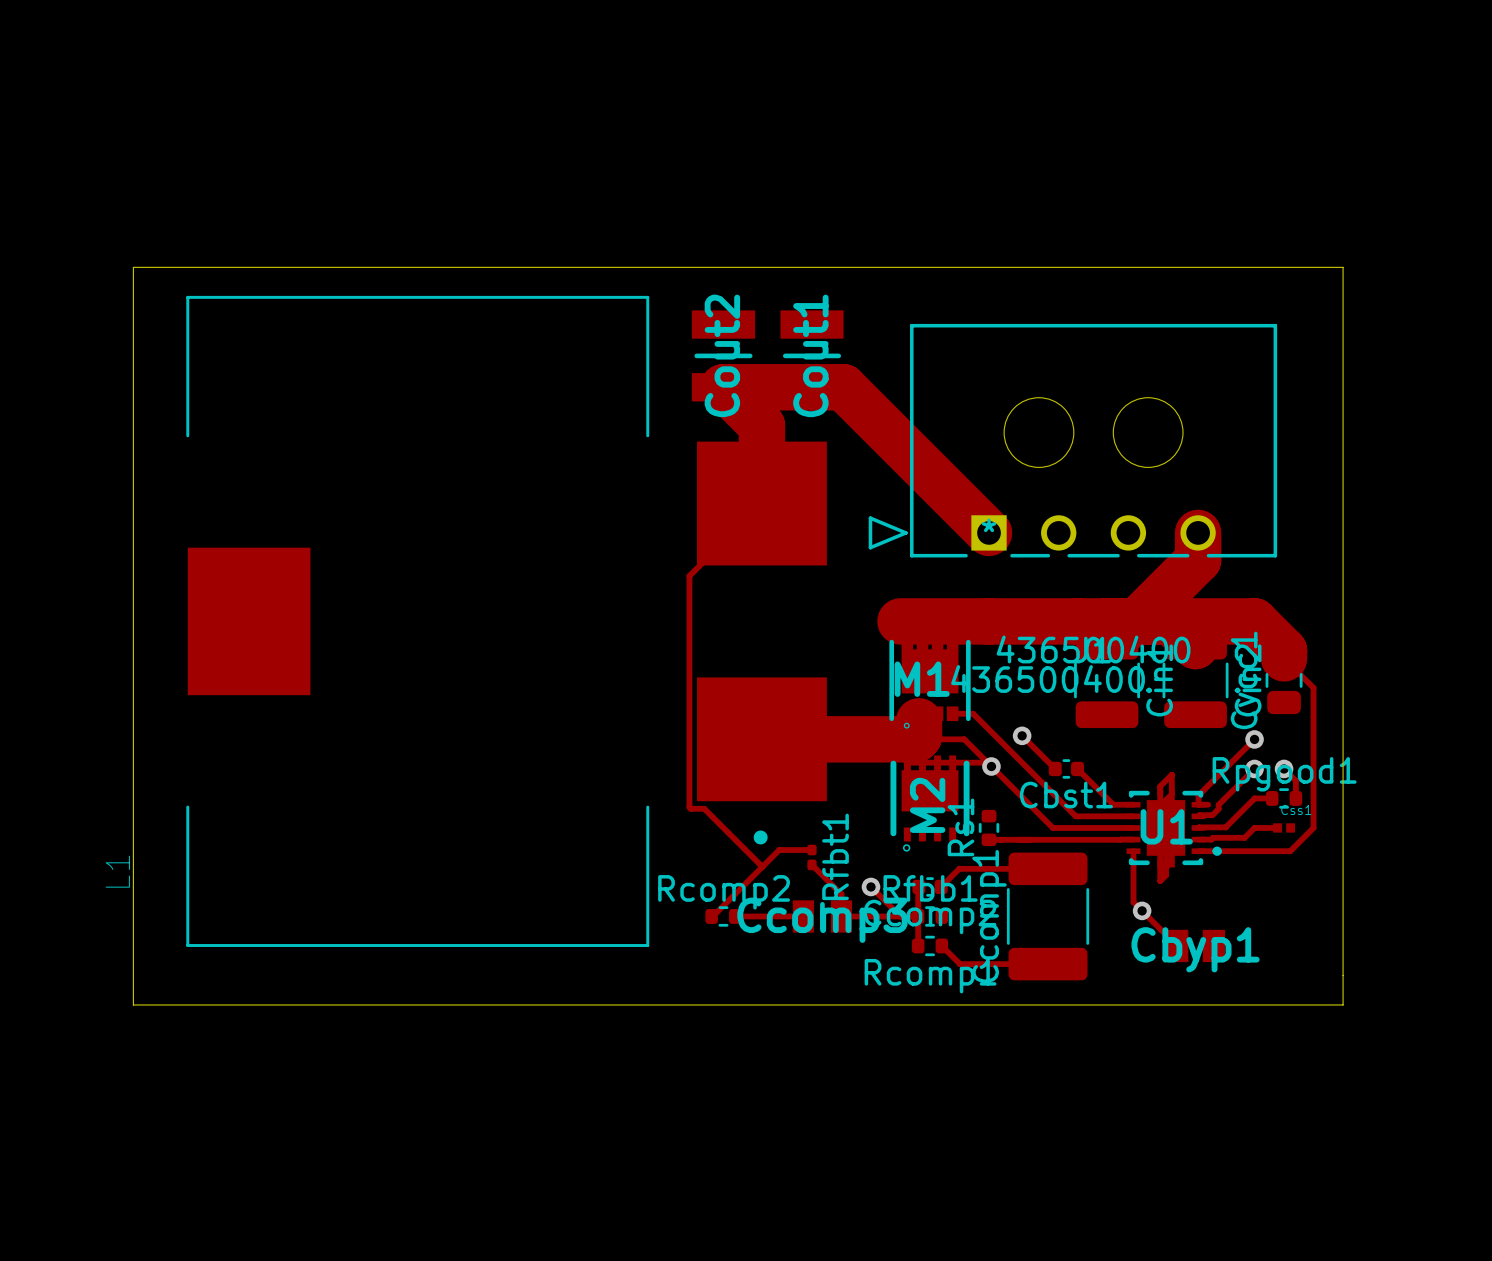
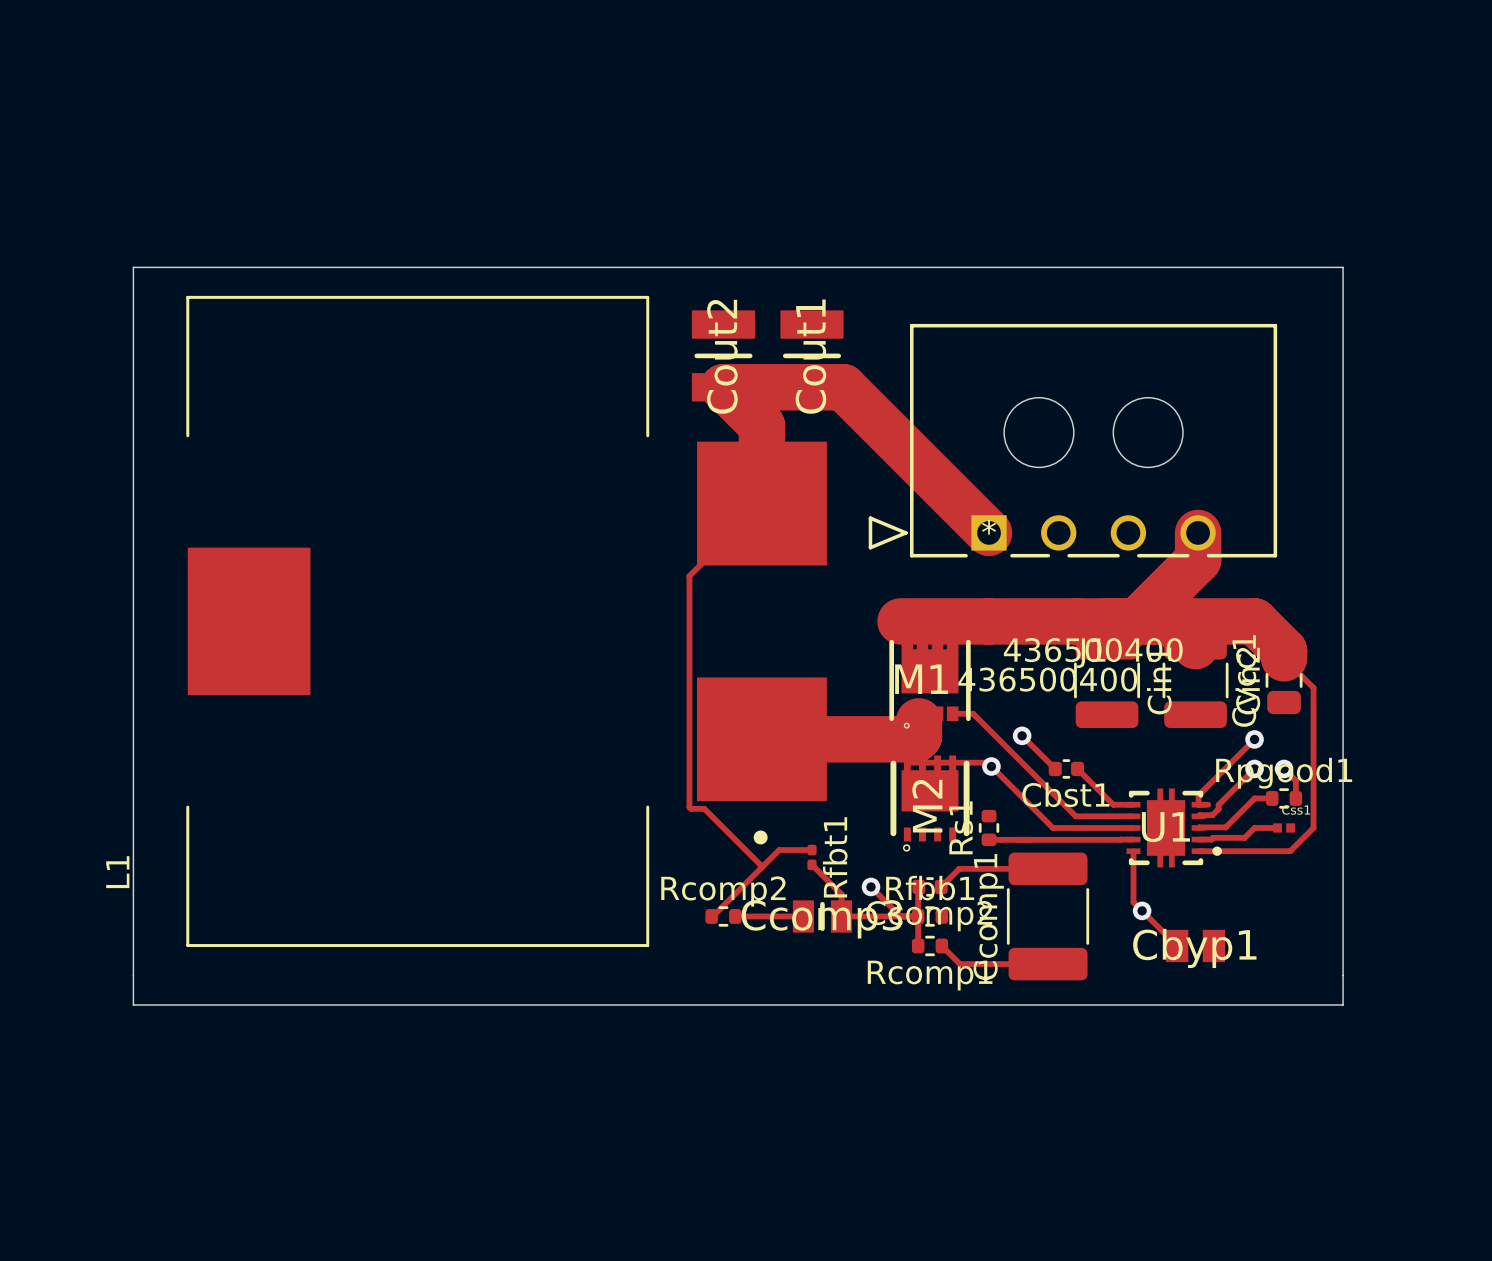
track: (915, 739) (964, 739) (987, 762) -> none
track: (1160, 794) (1160, 786) (1171, 774) (1171, 794) (1166, 800) (1166, 875) (1160, 881) (1160, 861) -> none

